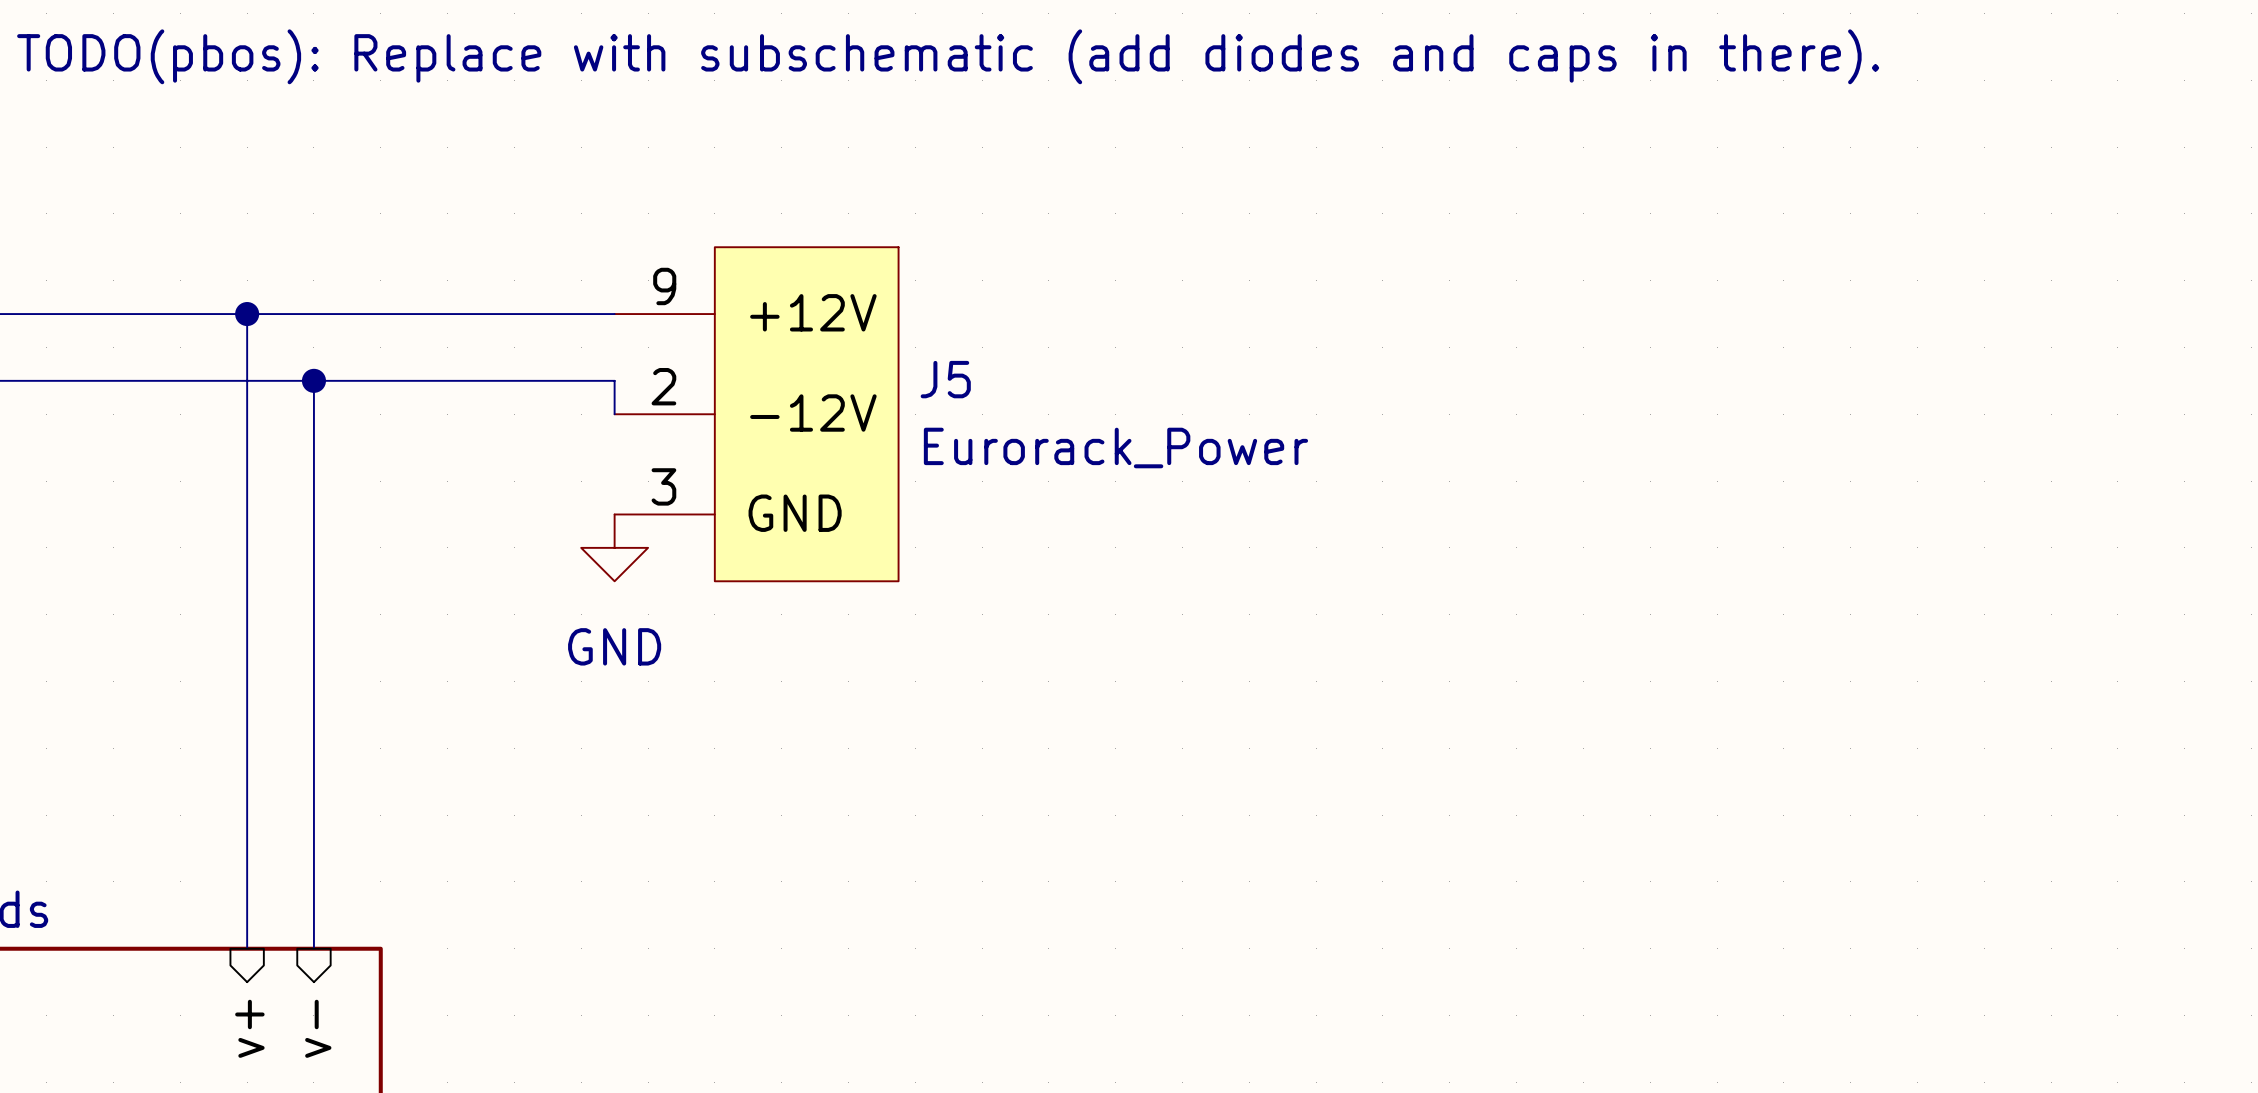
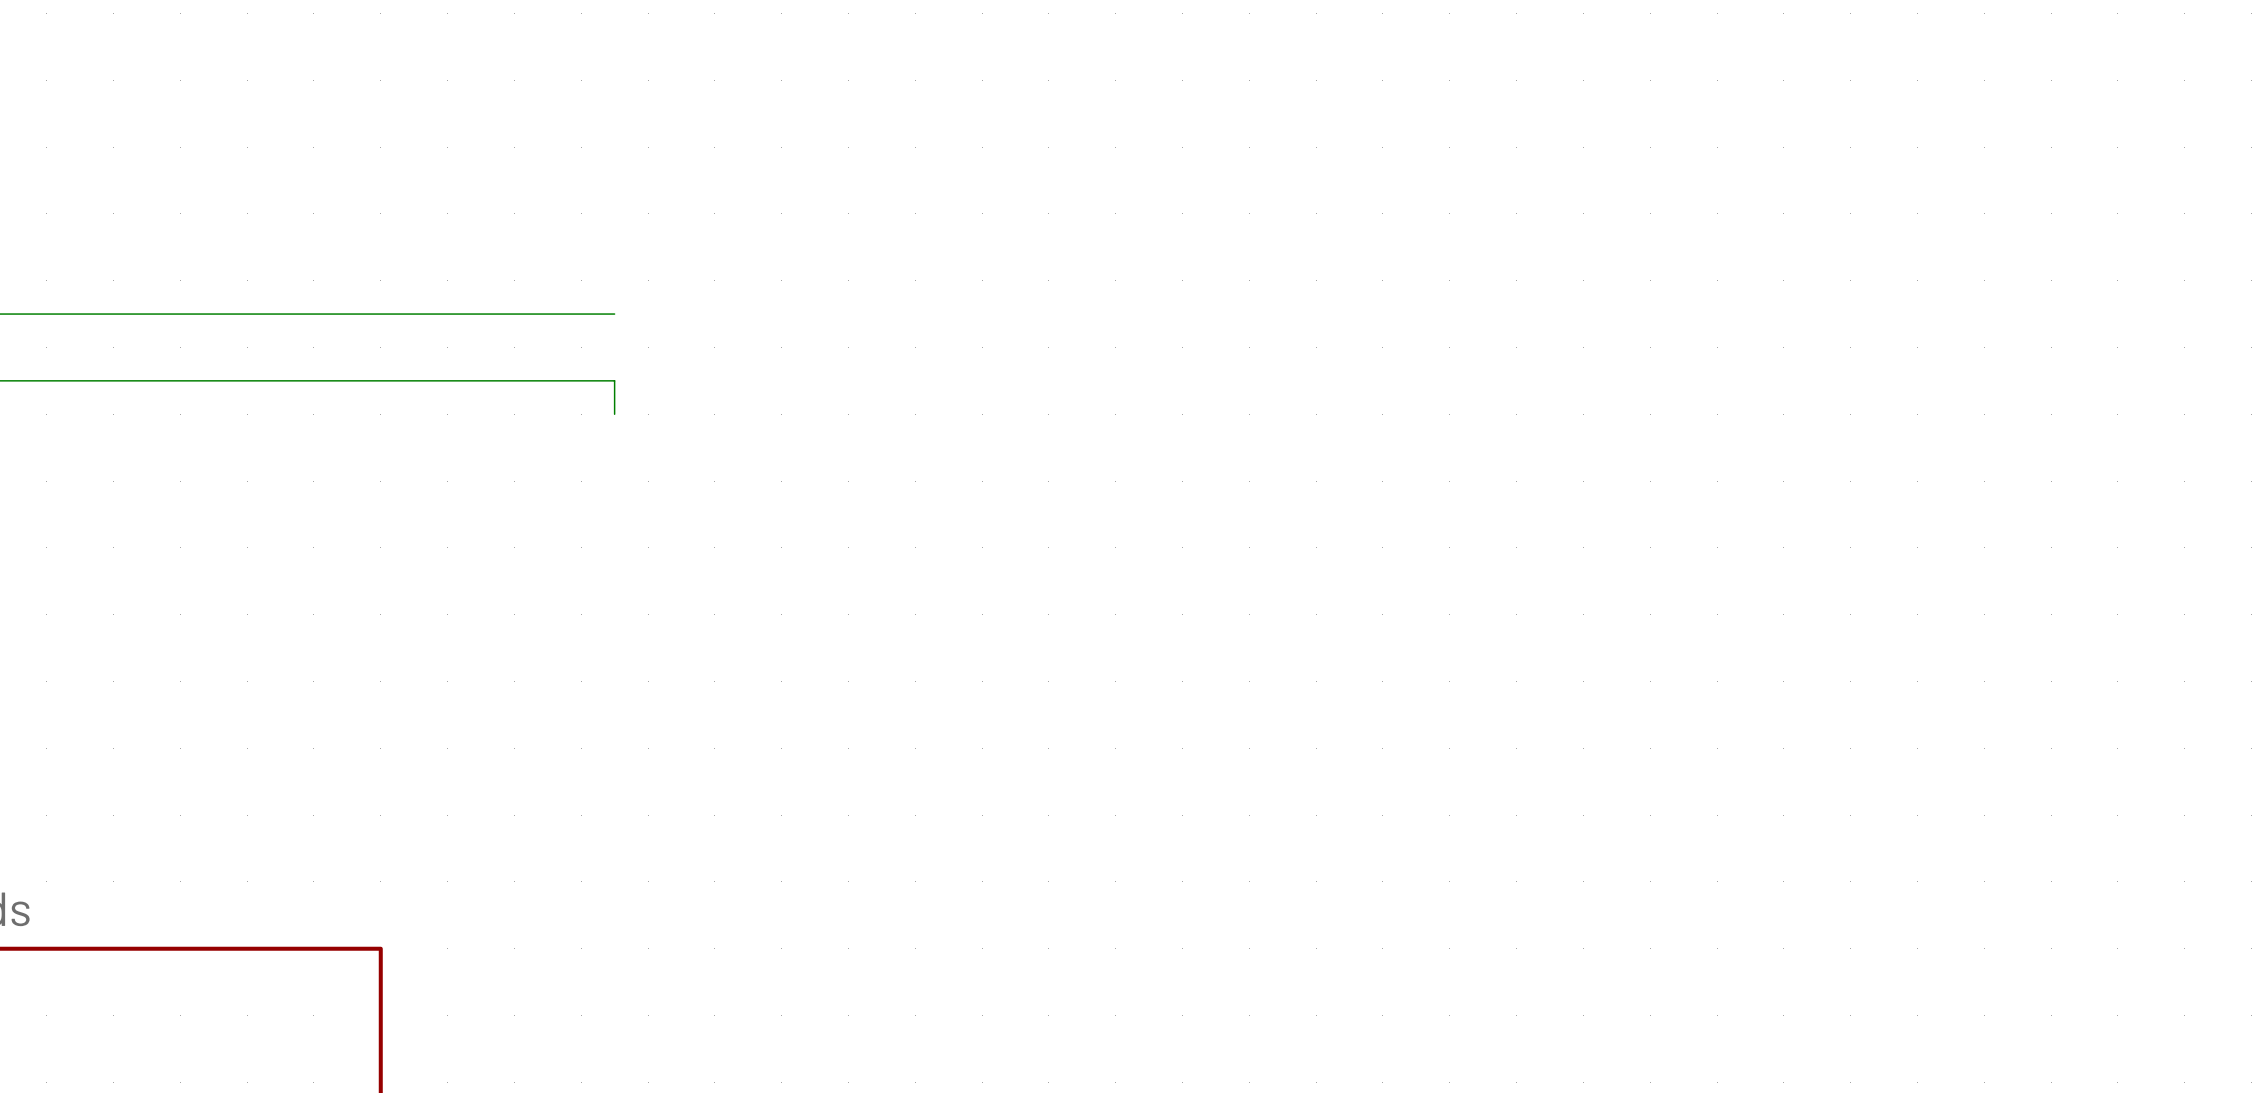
text: TODO(pbos): Replace with subschematic (add diodes and caps in there). (948, 56) -> none
wire: (247, 314) (247, 948) -> none
junction: (247, 314) -> none
wire: (313, 380) (313, 948) -> none
junction: (313, 380) -> none
J5: Eurorack_Power (756, 414) -> none
power symbol: GND (614, 547) -> none
sheet pin: v+ (249, 1028) -> none
sheet pin: v- (318, 1028) -> none

